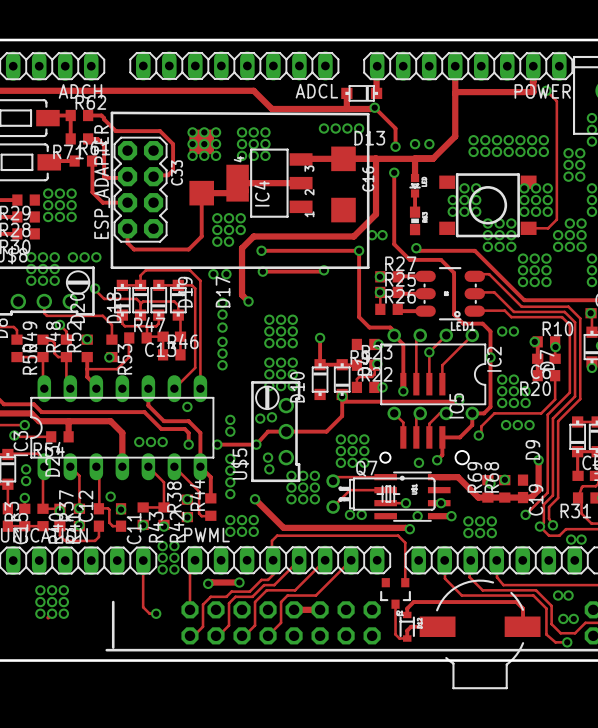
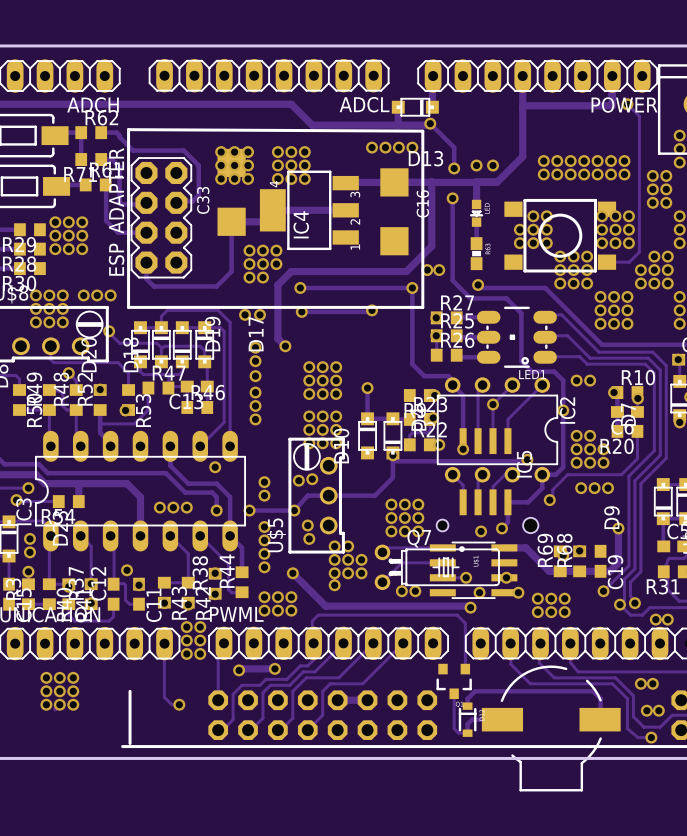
via position: (314, 475) -> (334, 585)

